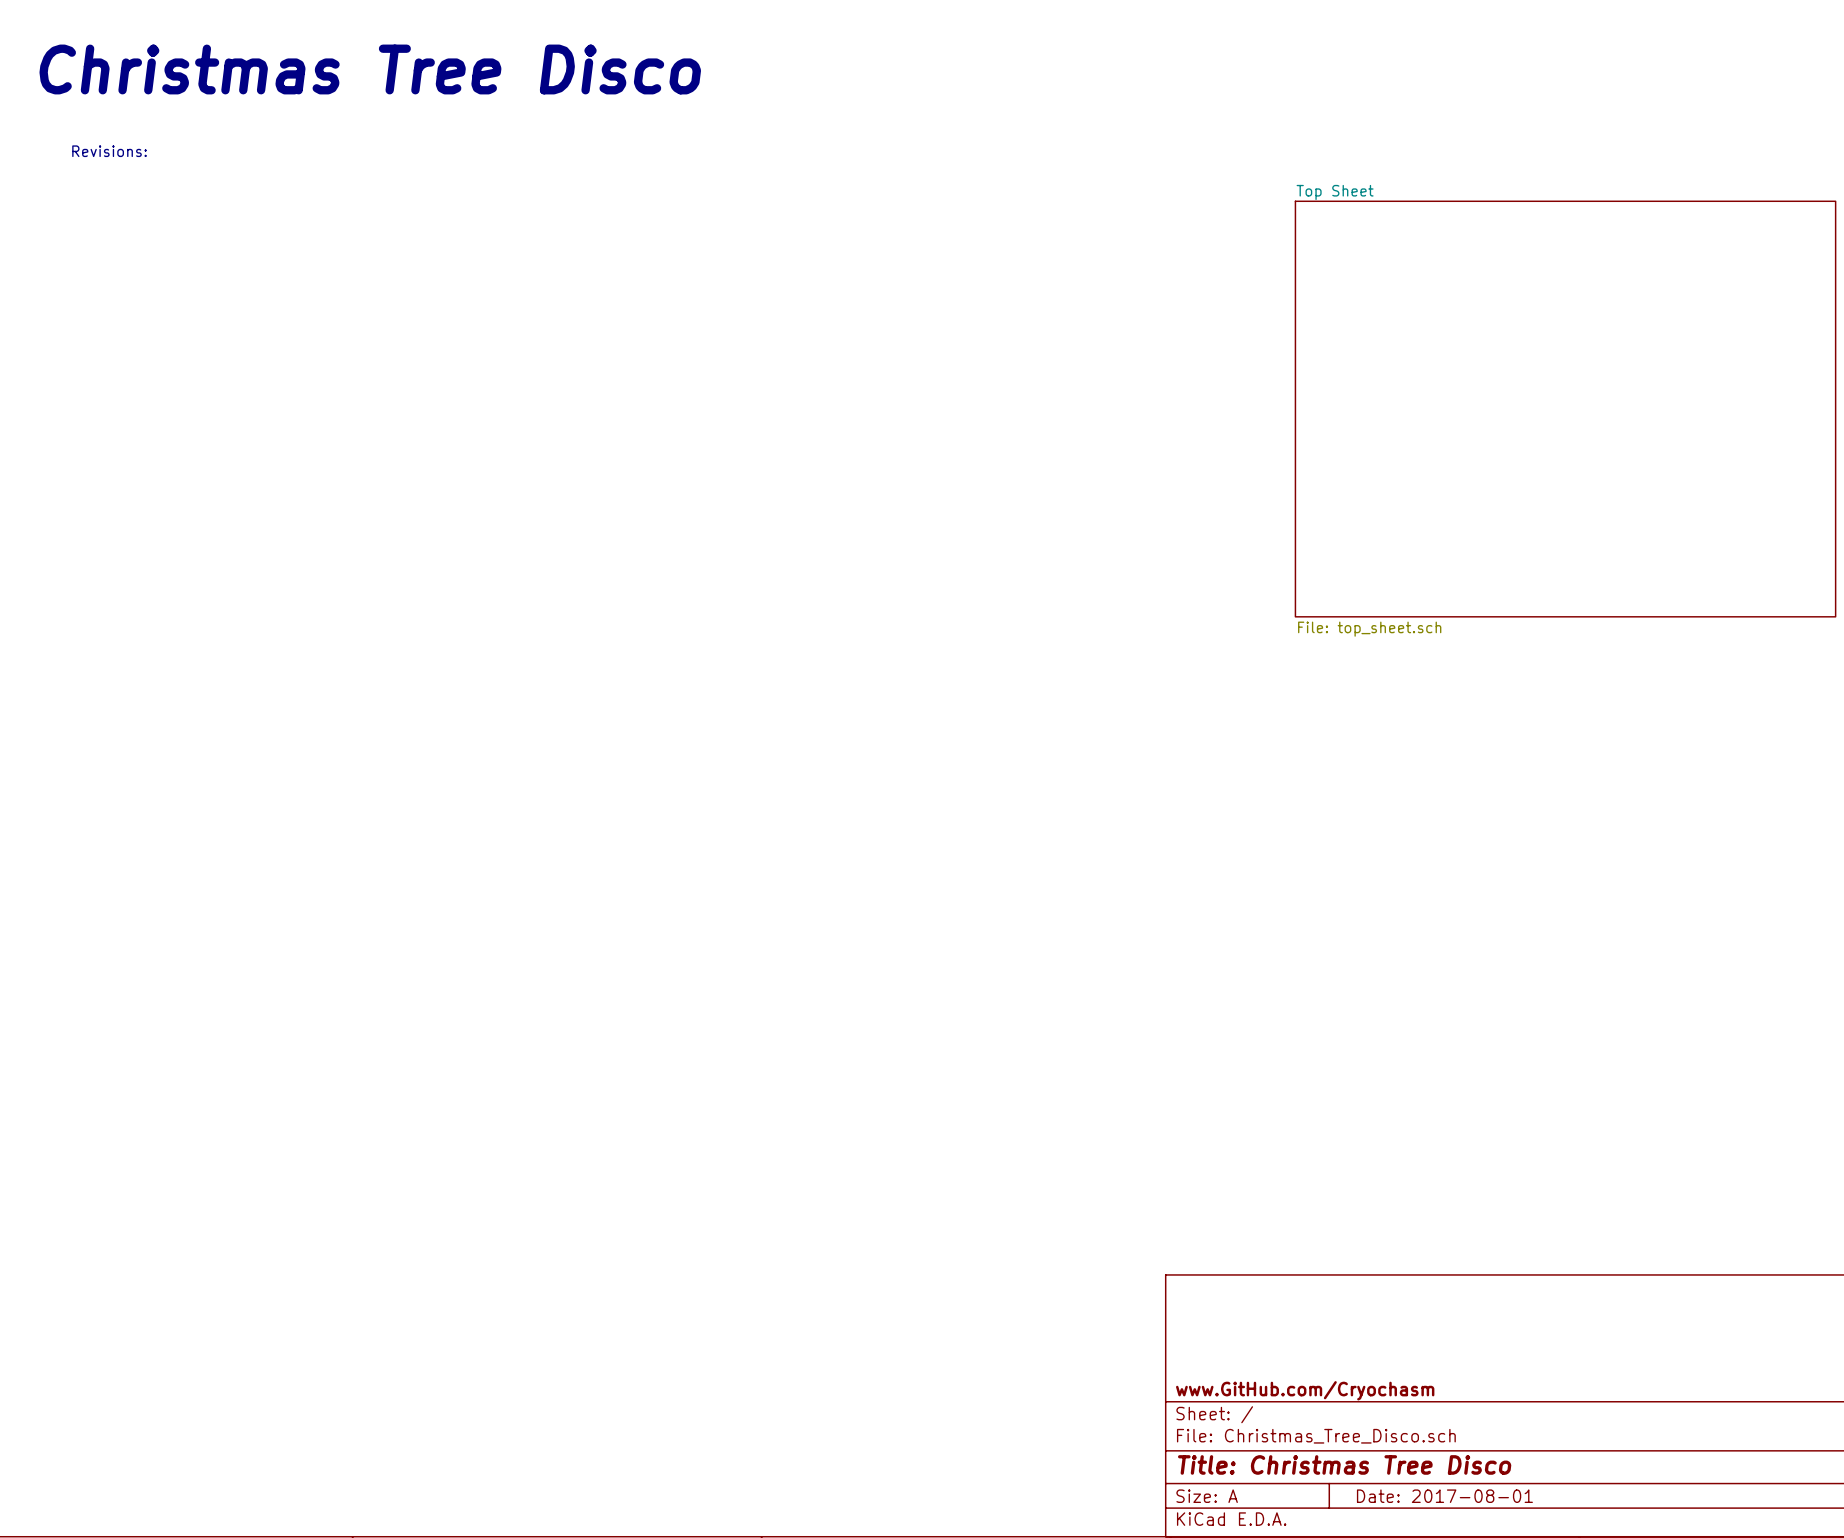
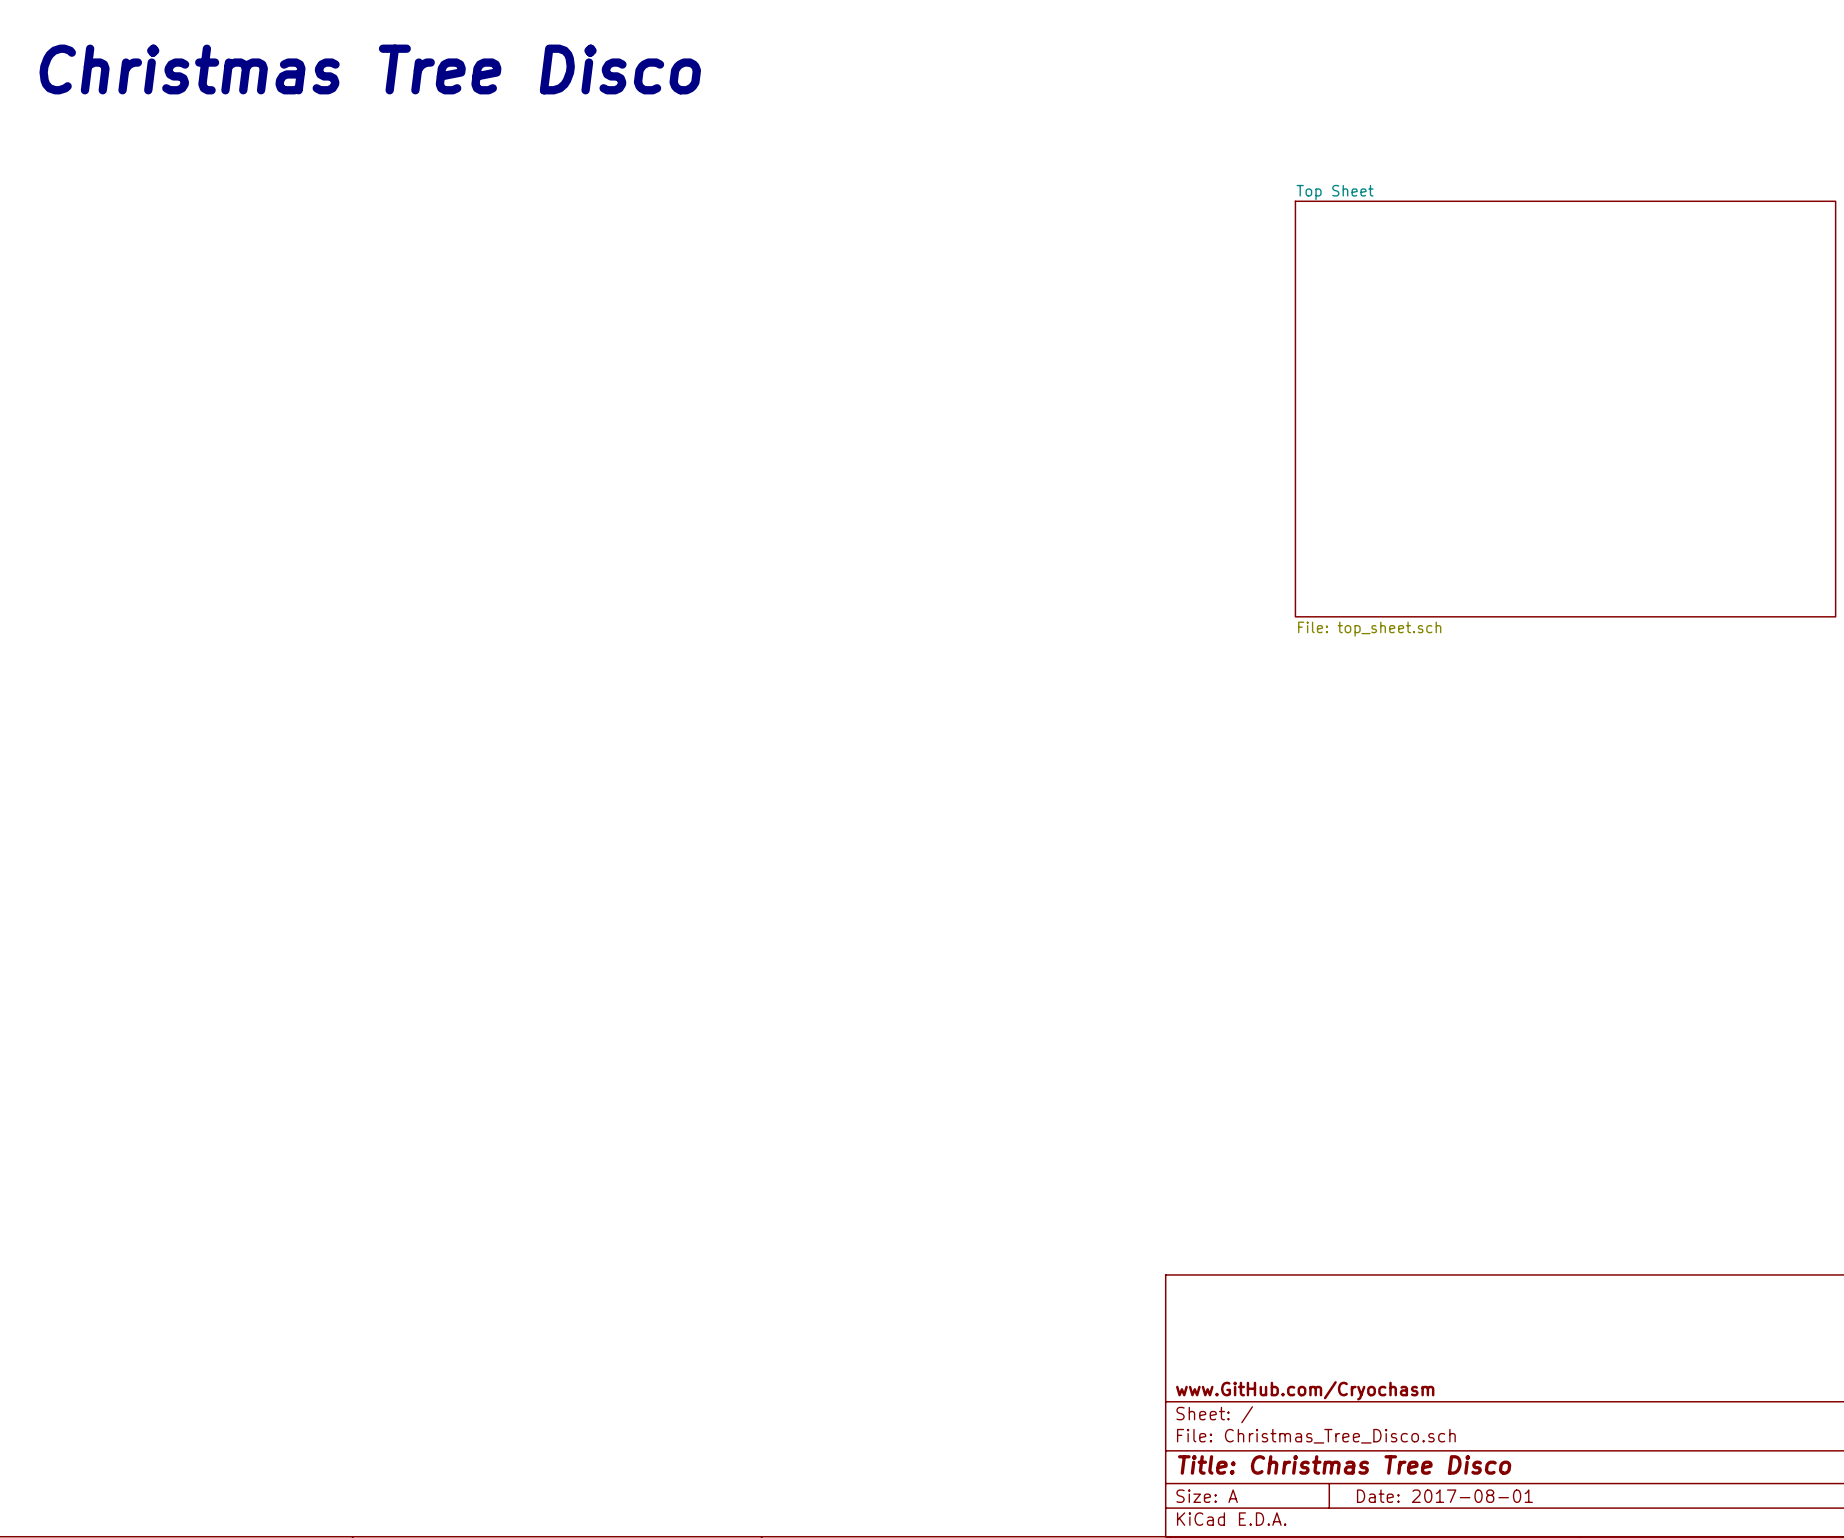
text: Revisions: (109, 151) -> none

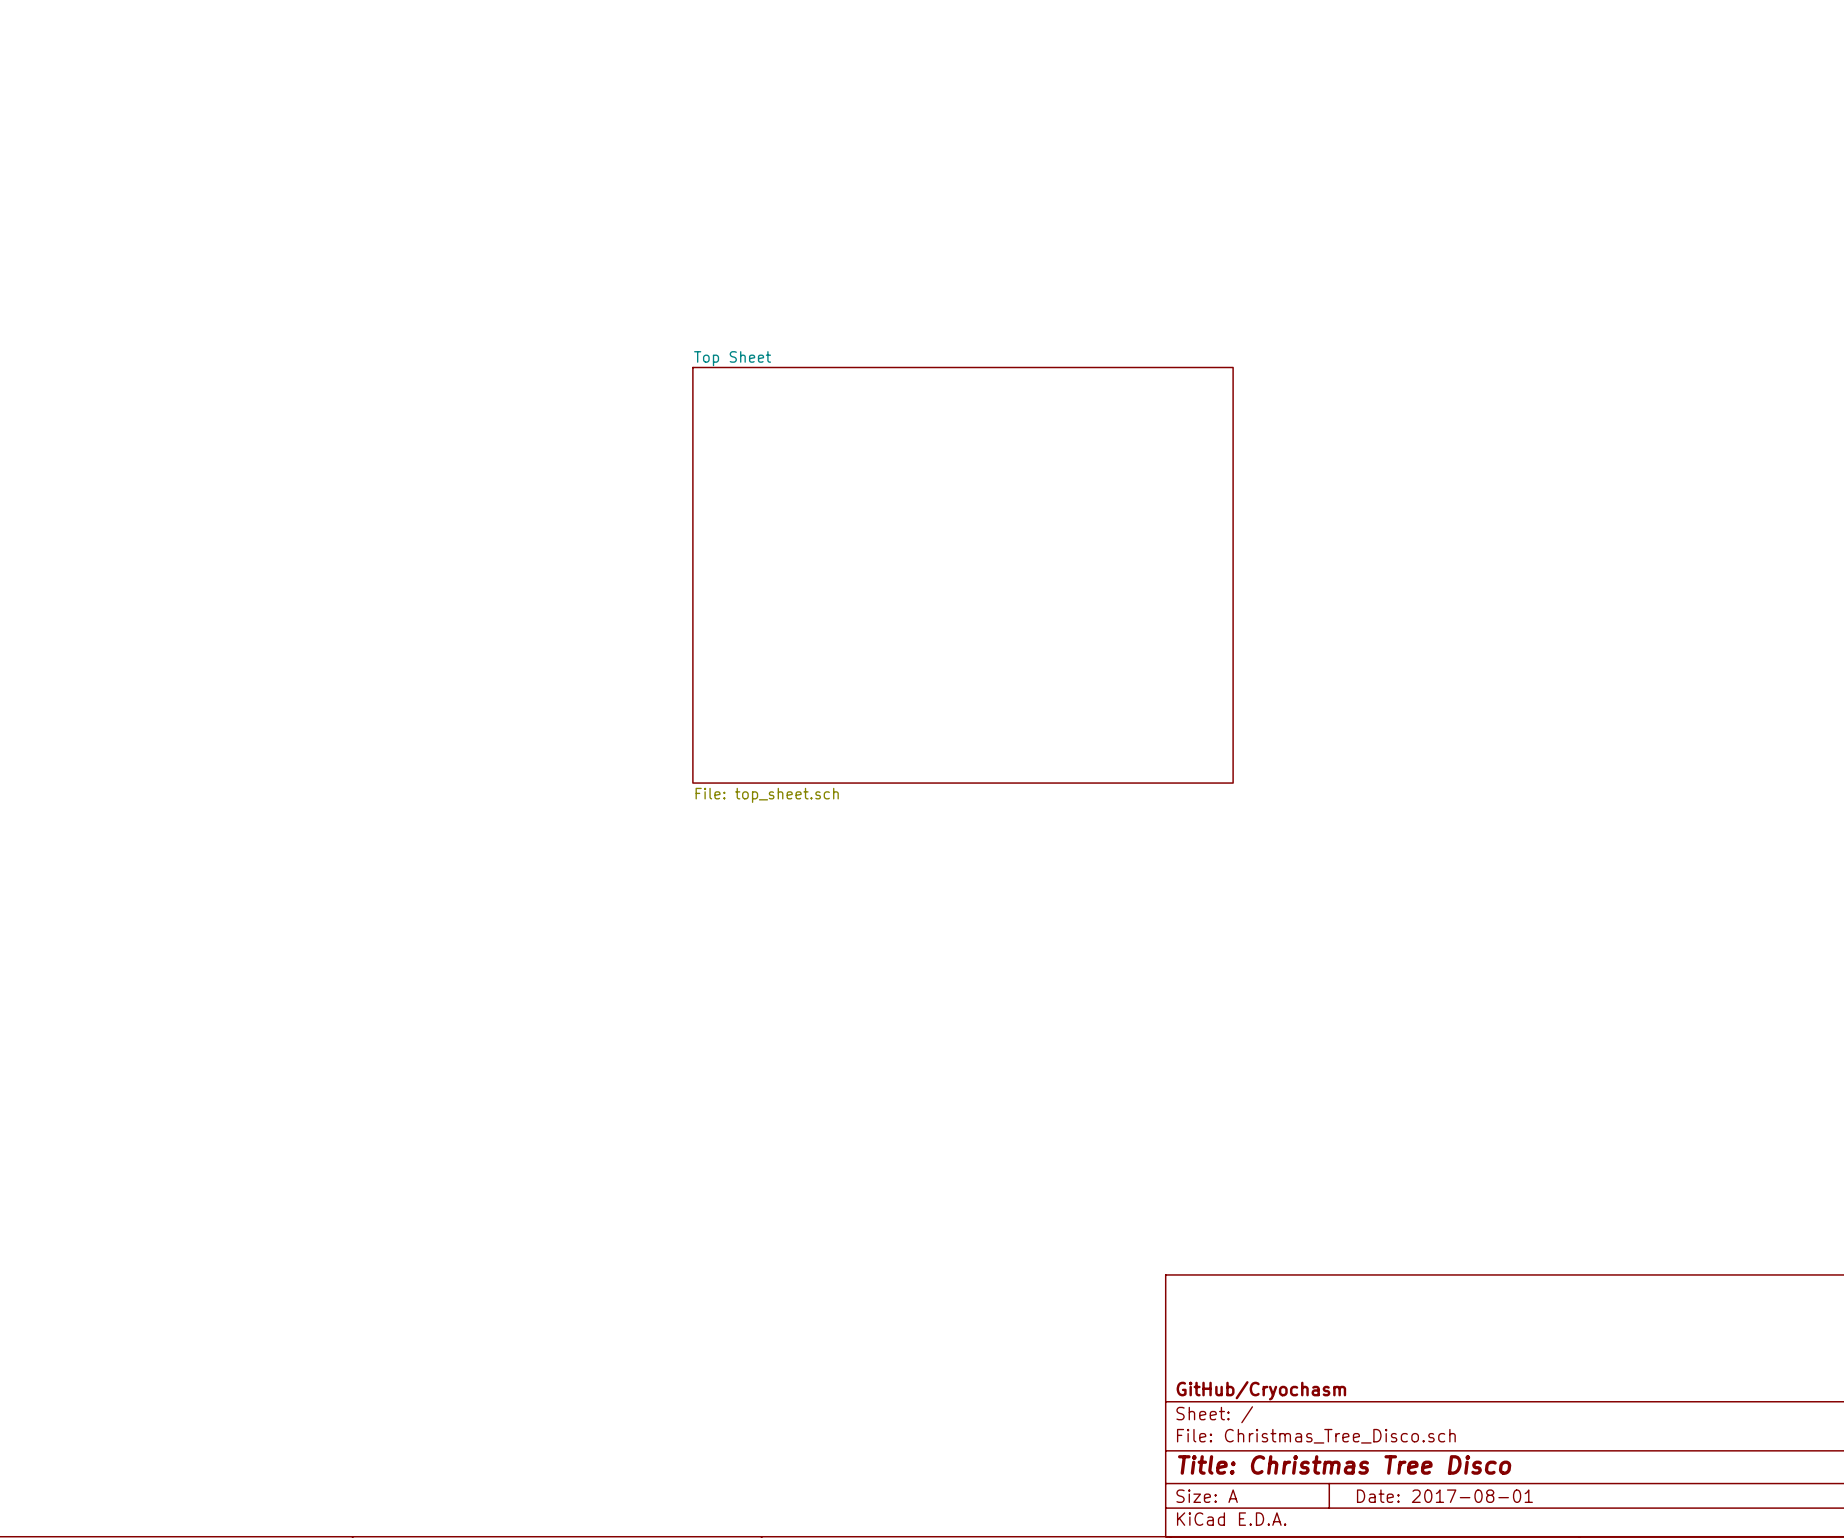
text: Christmas Tree Disco (370, 69) -> none
sheet Top Sheet: File: top_sheet.sch (1565, 409) -> none
sheet Top Sheet: none -> File: top_sheet.sch (963, 575)
title block: www.GitHub.com/Cryochasm (1305, 1390) -> GitHub/Cryochasm (1261, 1390)

